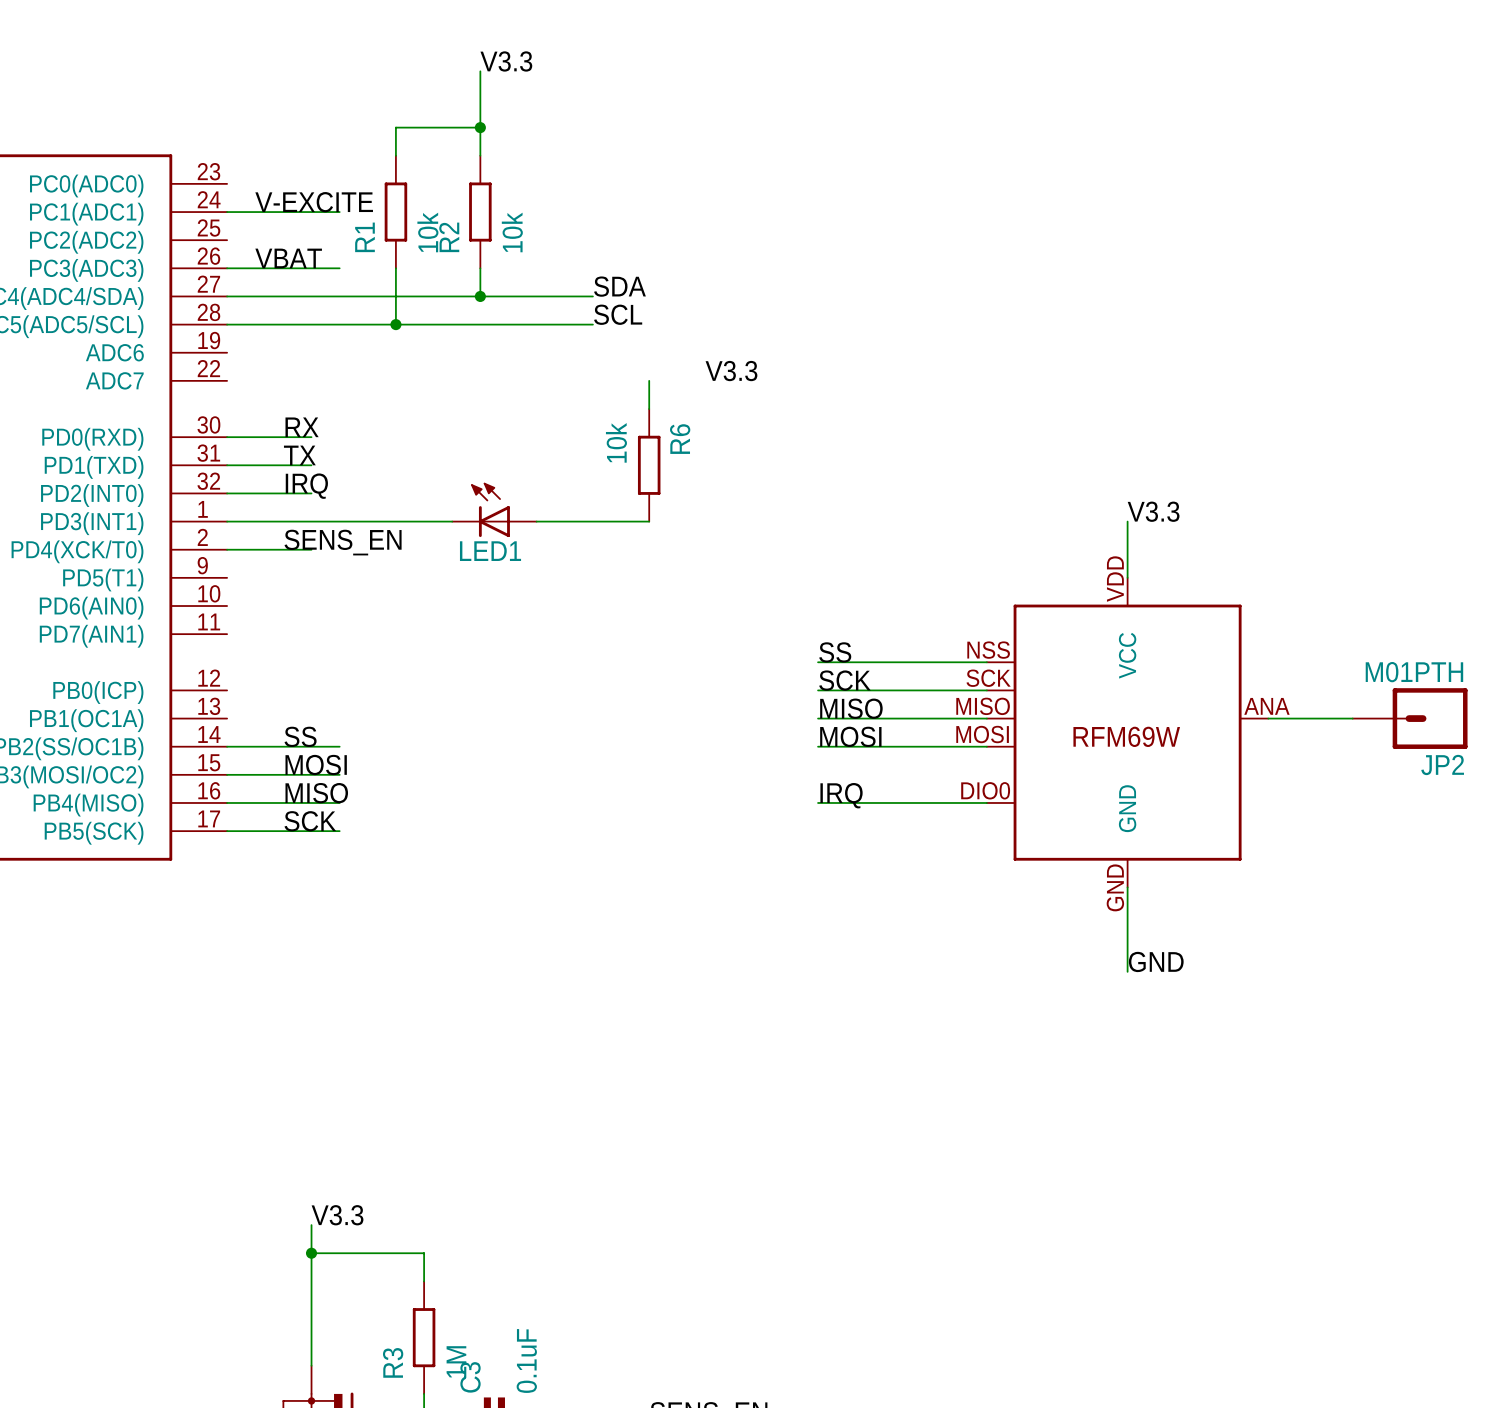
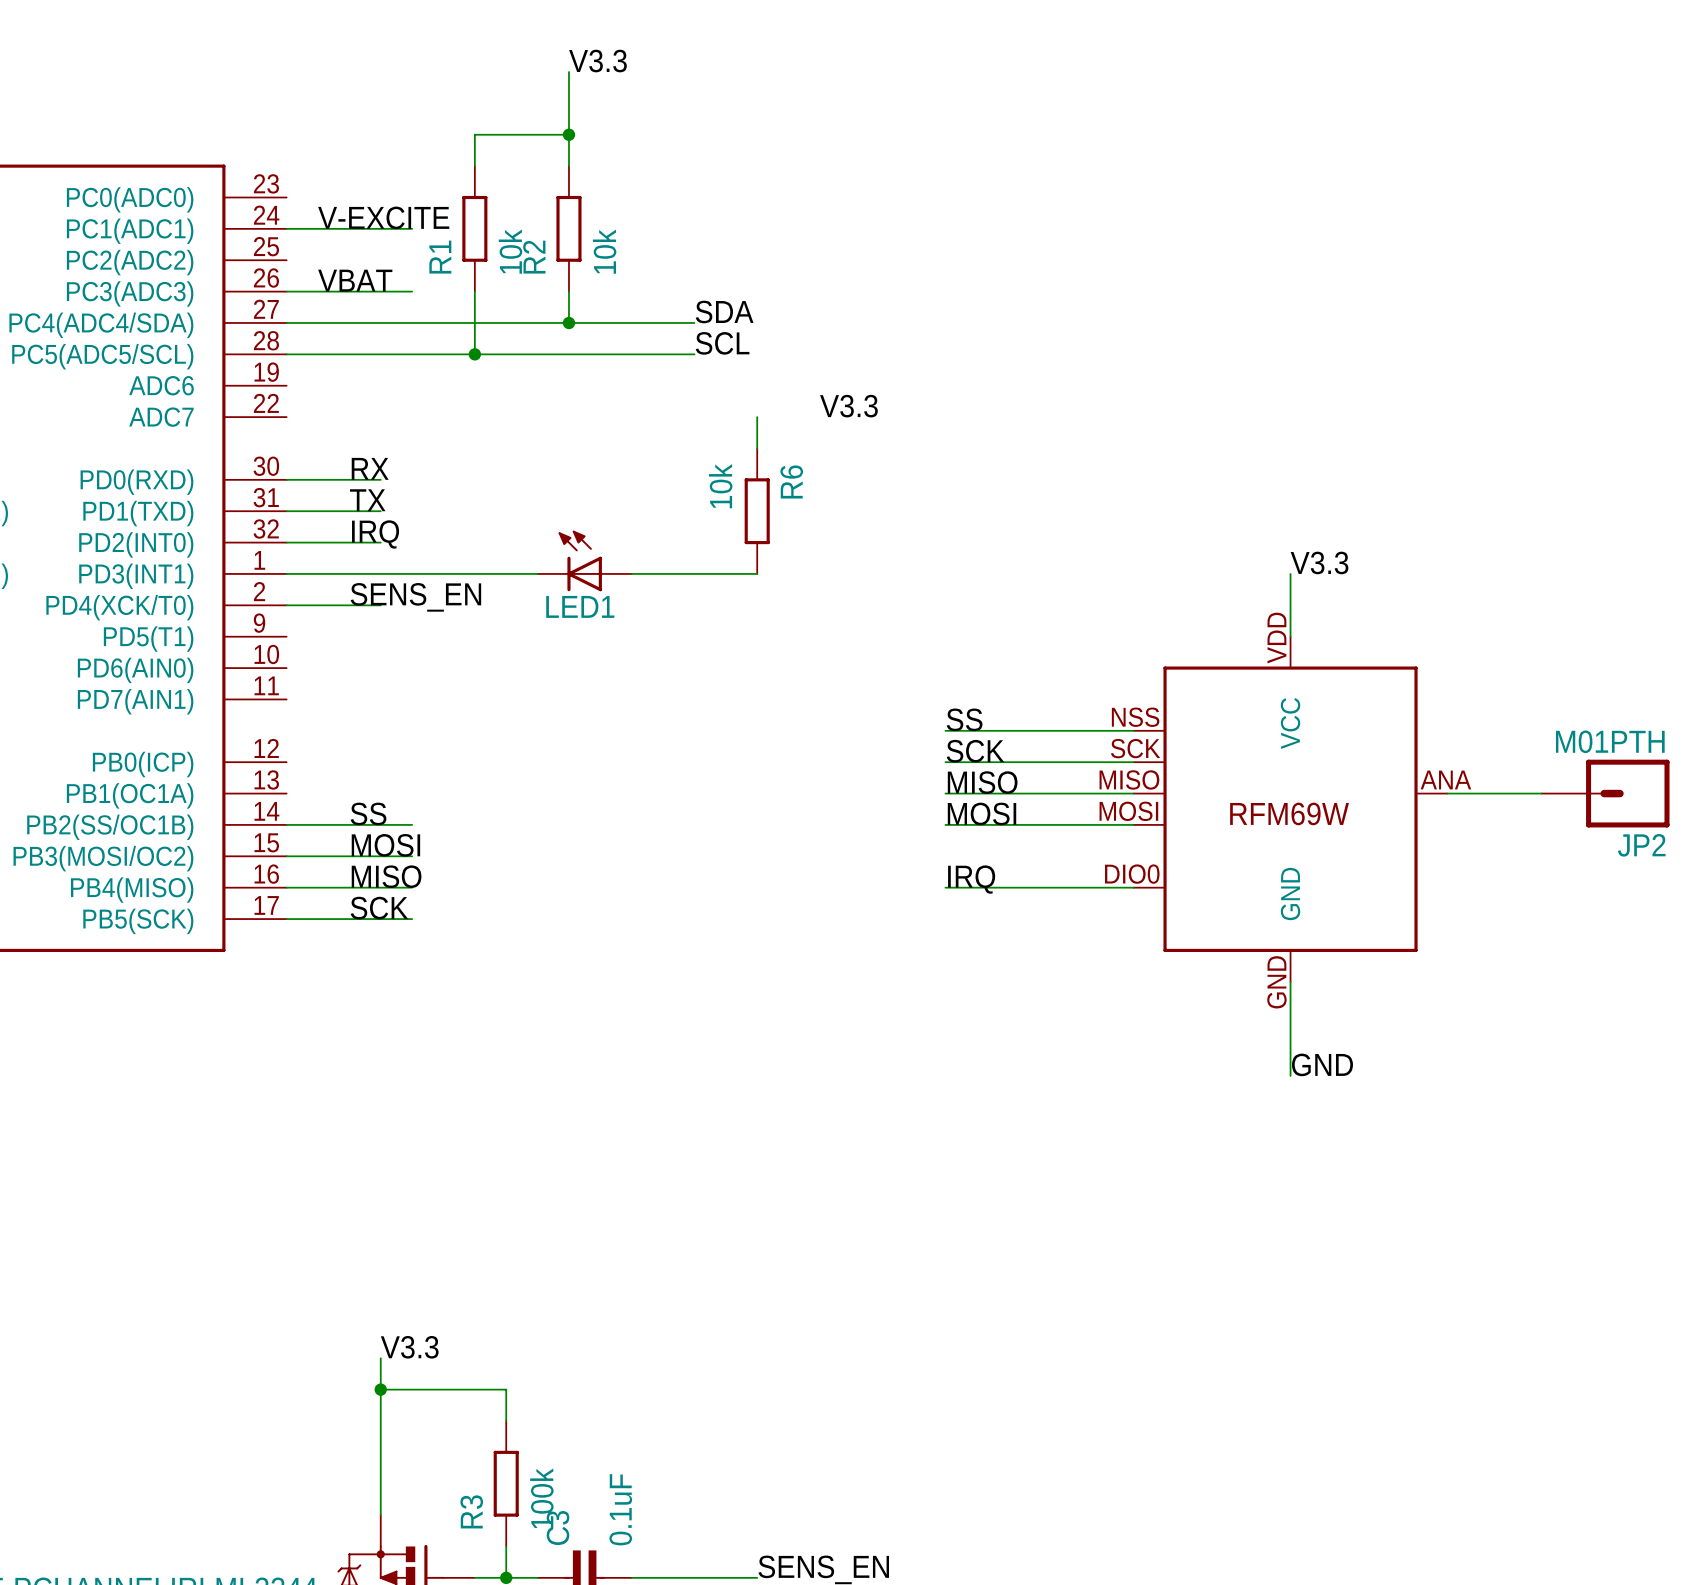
R3 value: 1M (456, 1362) -> 100k (541, 1498)

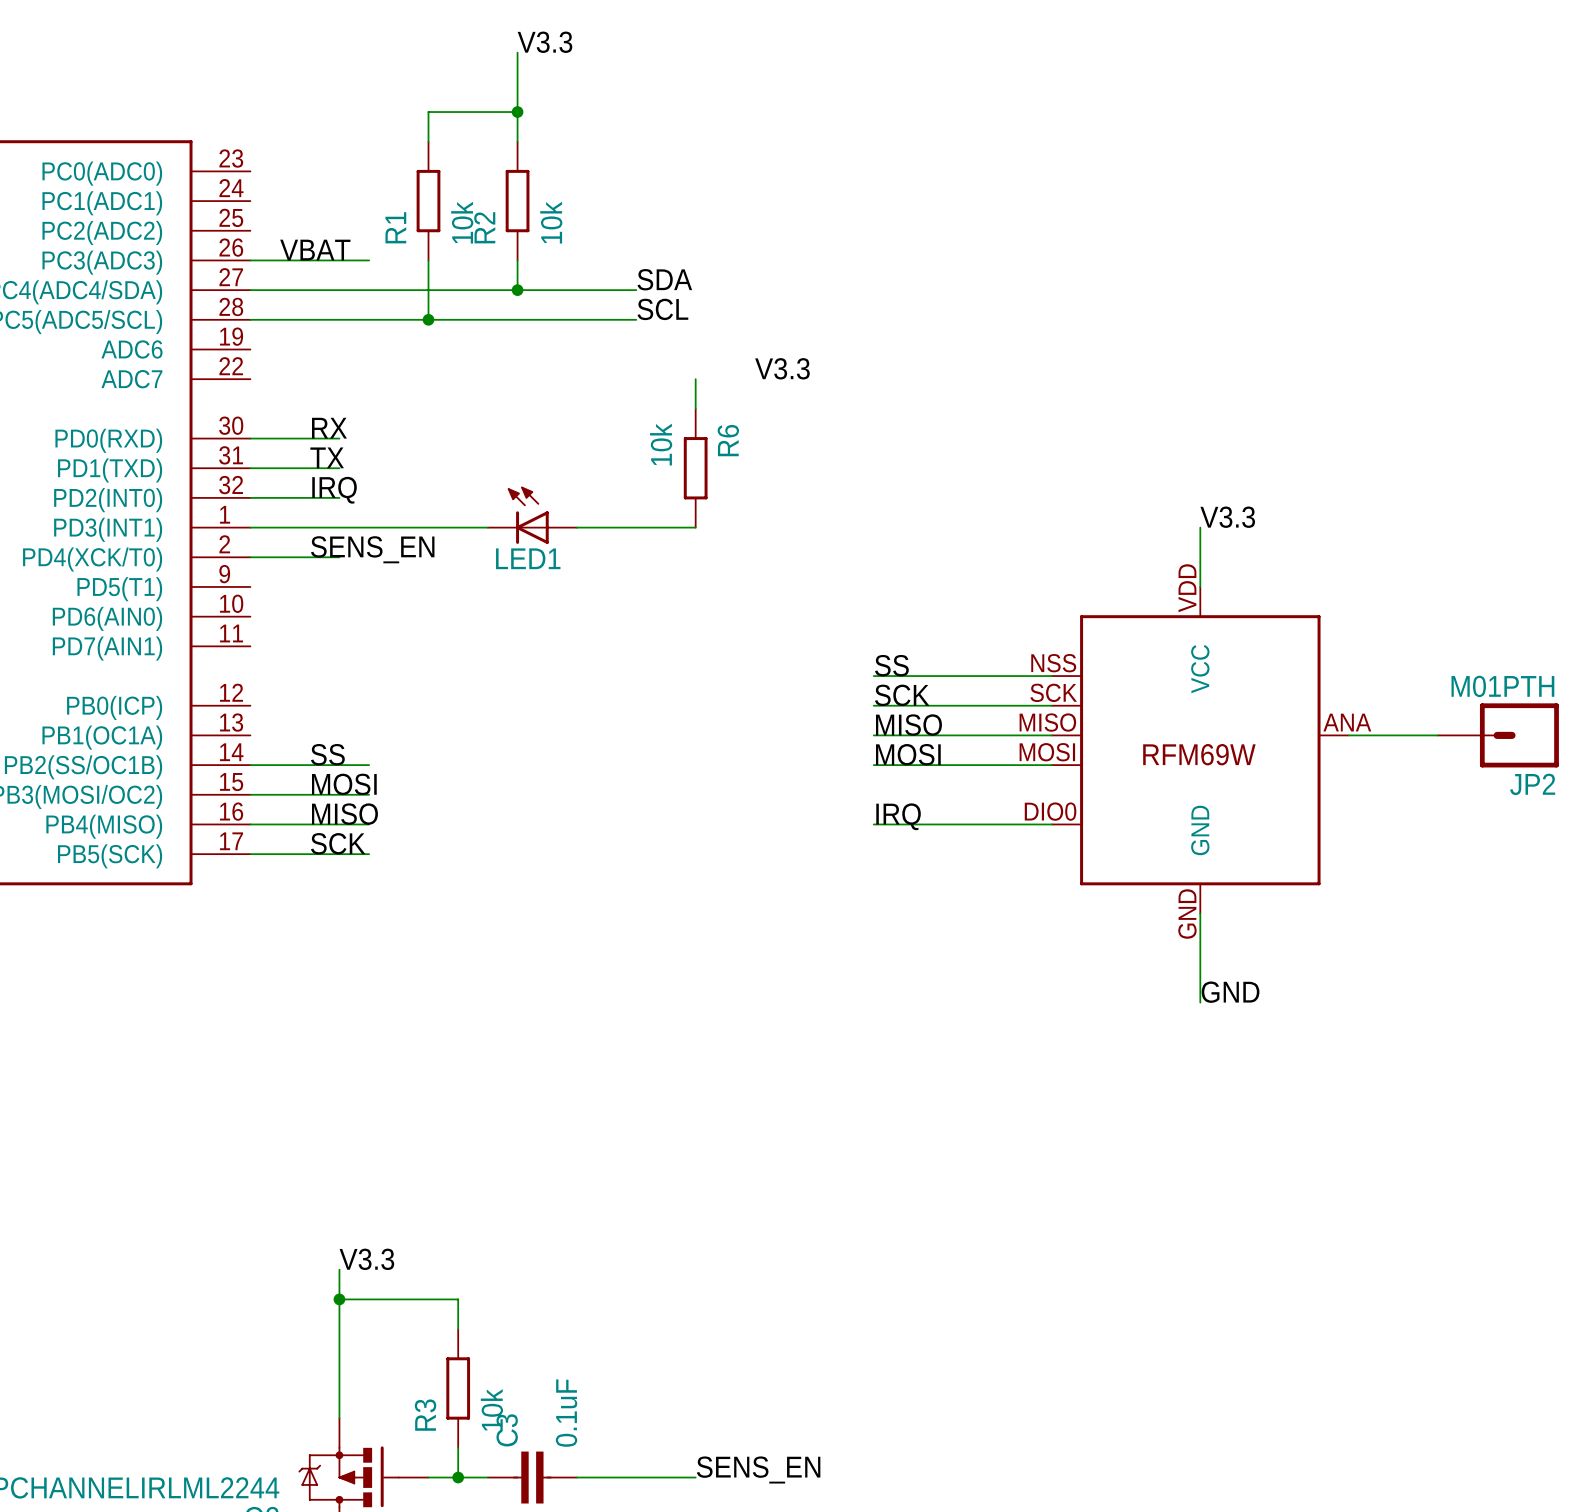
label: V-EXCITE (383, 217) -> none
wire: (286, 228) (412, 228) -> none
R3 value: 100k (541, 1498) -> 10k (491, 1410)

